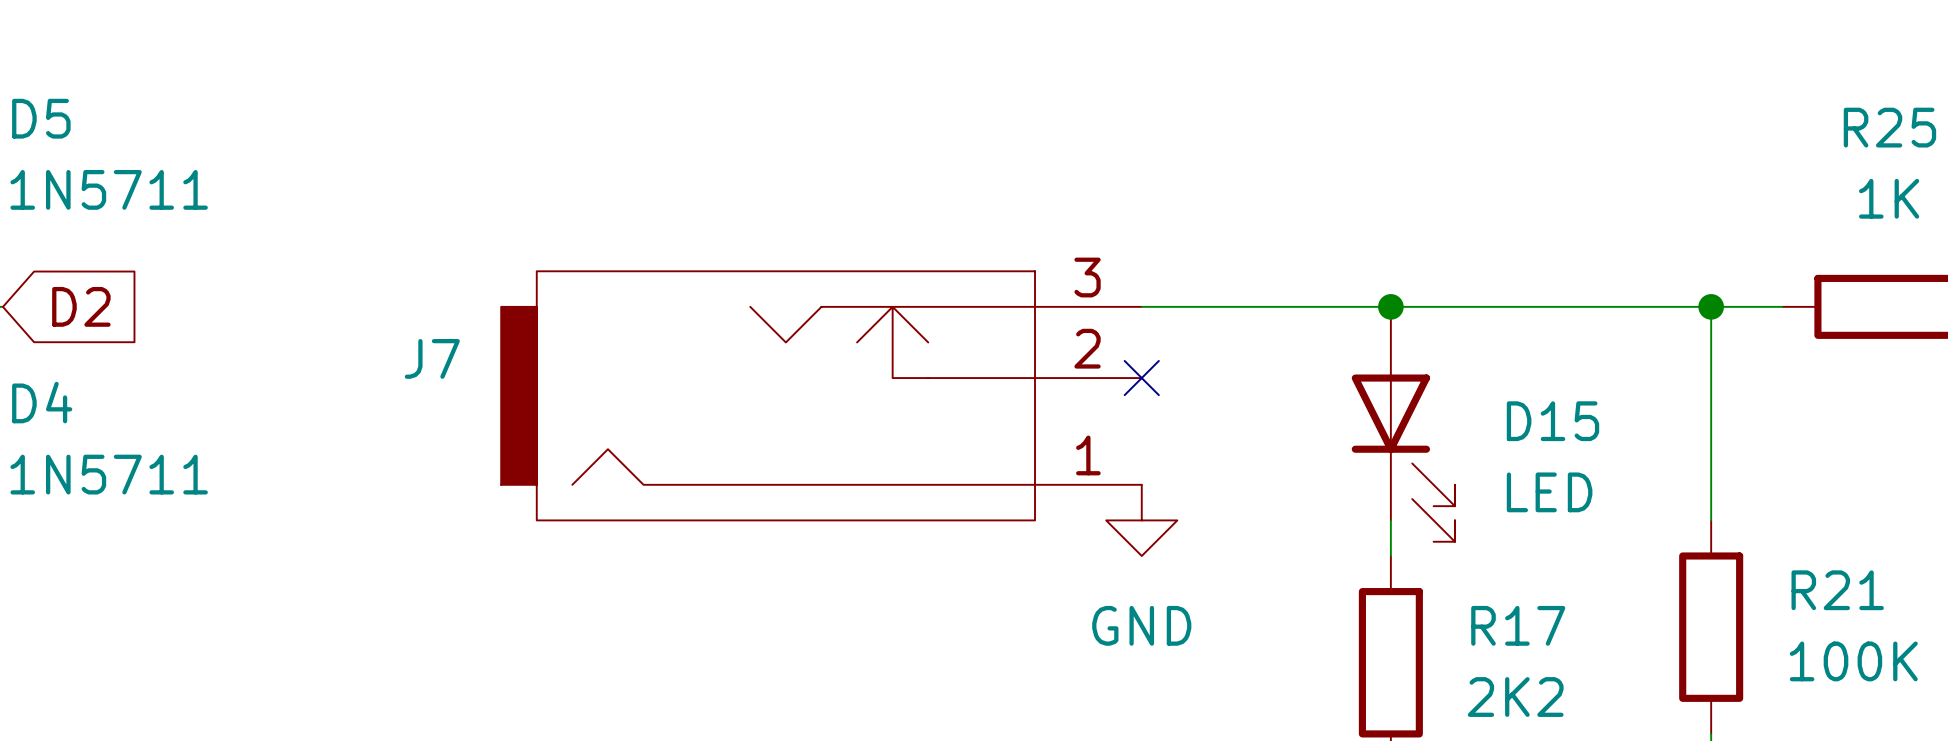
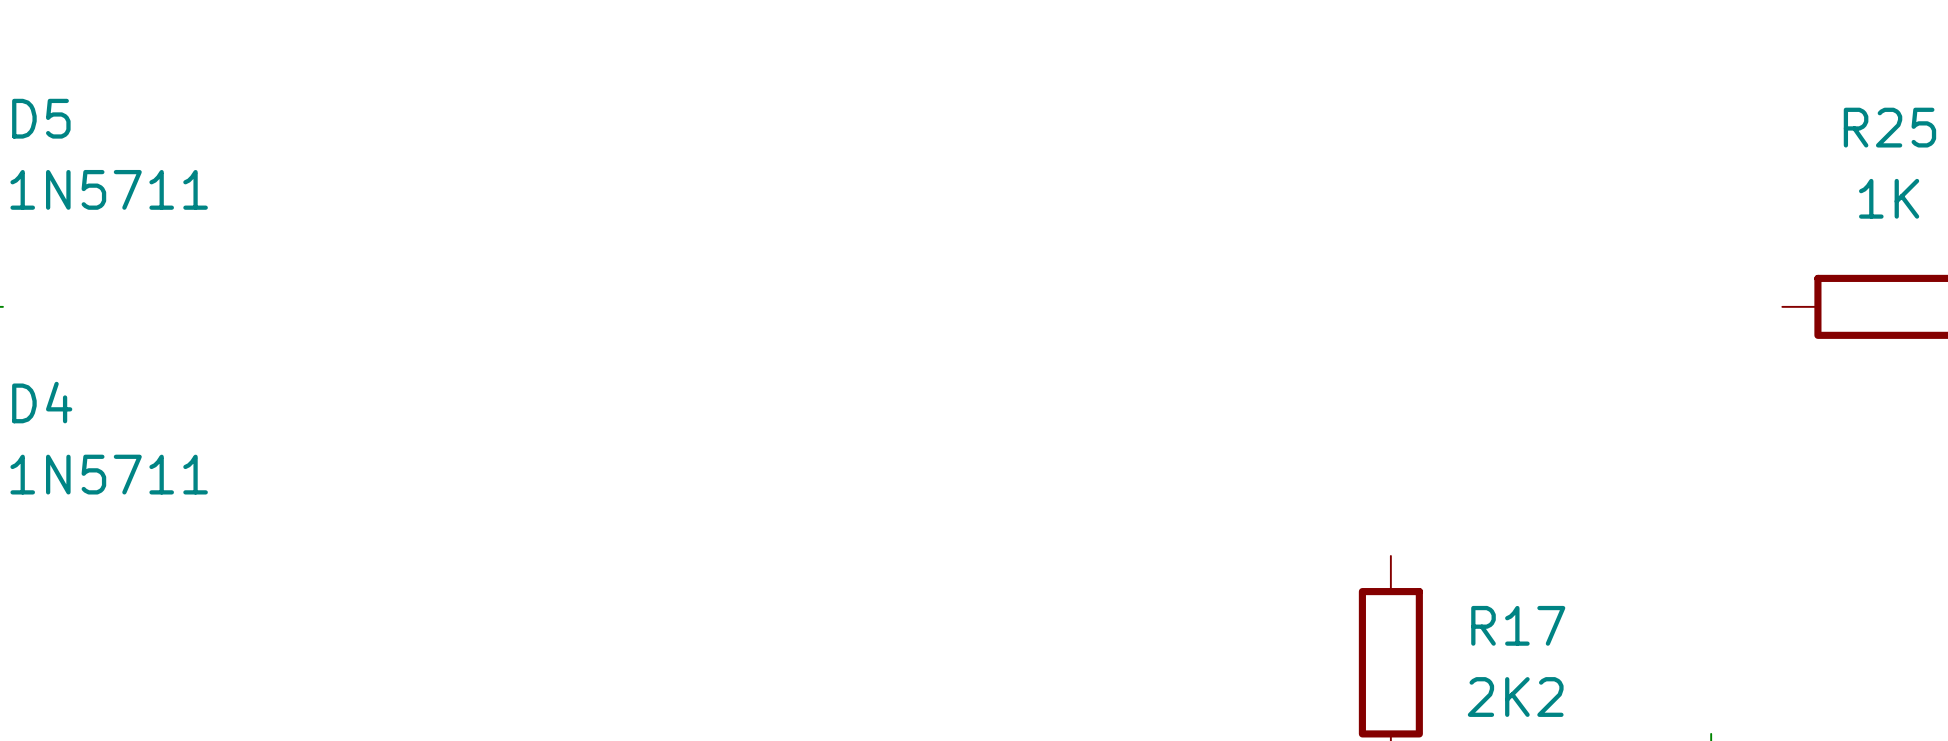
global label: D2 (81, 306) -> none
wire: (1141, 306) (1782, 306) -> none
junction: (1390, 306) -> none
wire: (1711, 306) (1711, 520) -> none
junction: (1711, 306) -> none
no-connect mark: (1141, 378) -> none
J7: (821, 395) -> none
D15: LED (1403, 424) -> none
power symbol: GND (1141, 520) -> none
wire: (1390, 520) (1390, 555) -> none
R21: 100K (1711, 627) -> none

